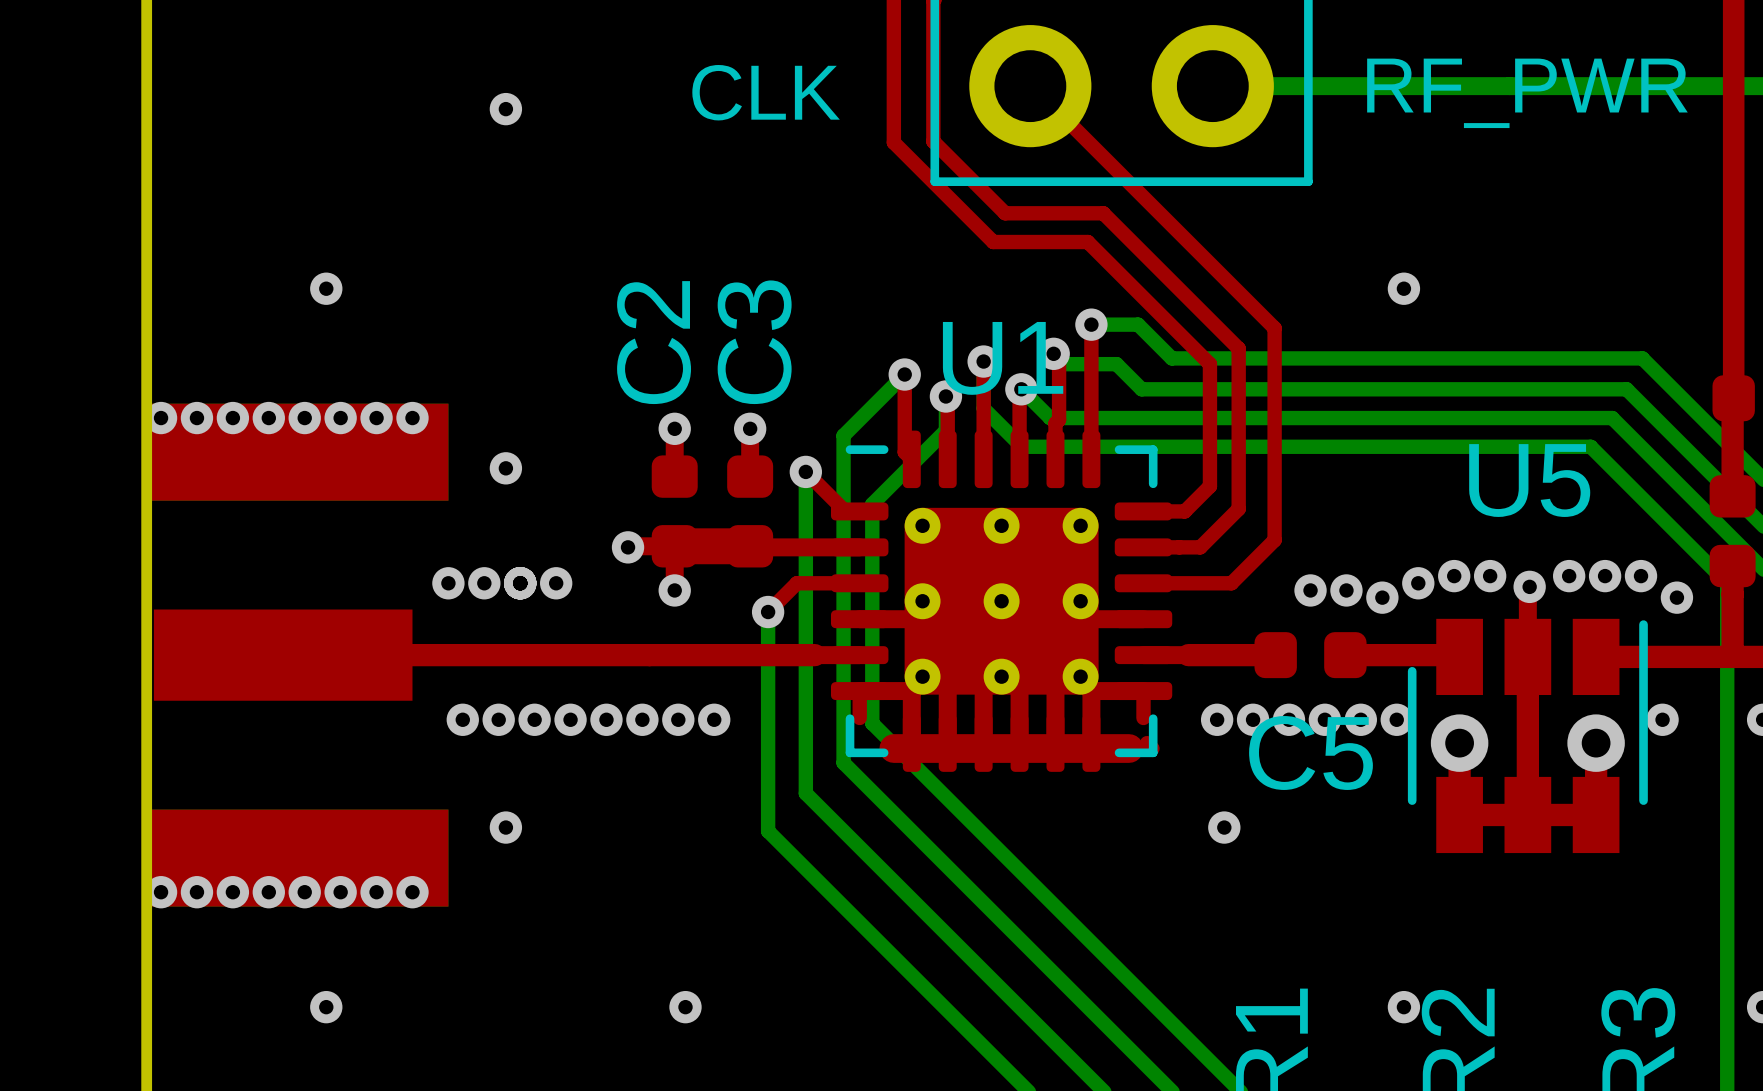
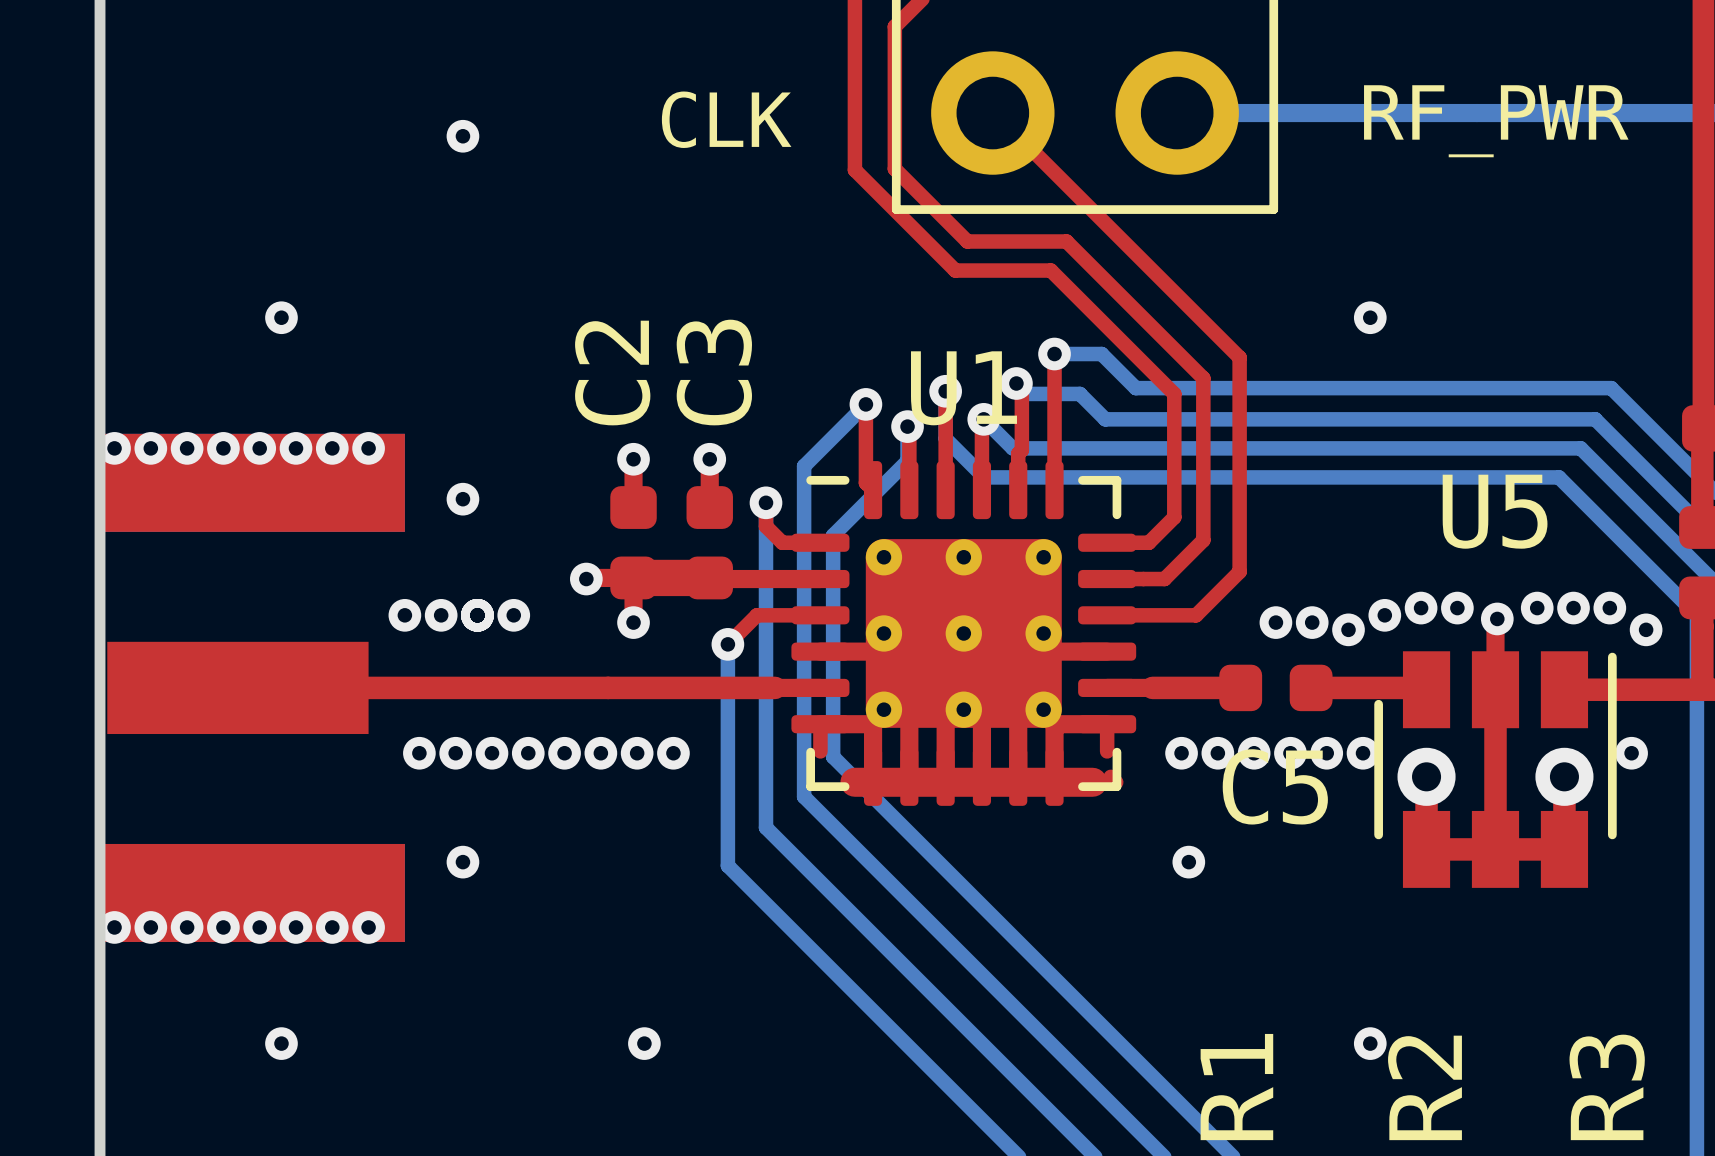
top track: (805, 471) (845, 511) -> (765, 502) (765, 526) (782, 542) (805, 542)

